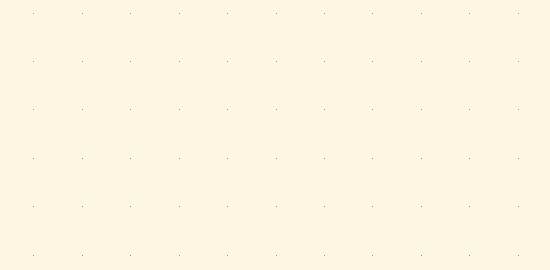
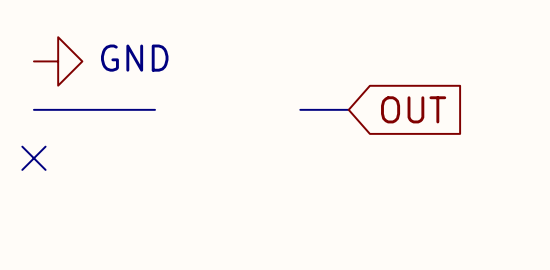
power symbol: none -> GND (58, 61)
wire: none -> (33, 109) (155, 109)
wire: none -> (300, 109) (348, 109)
global label: none -> OUT (413, 109)
no-connect mark: none -> (33, 158)

